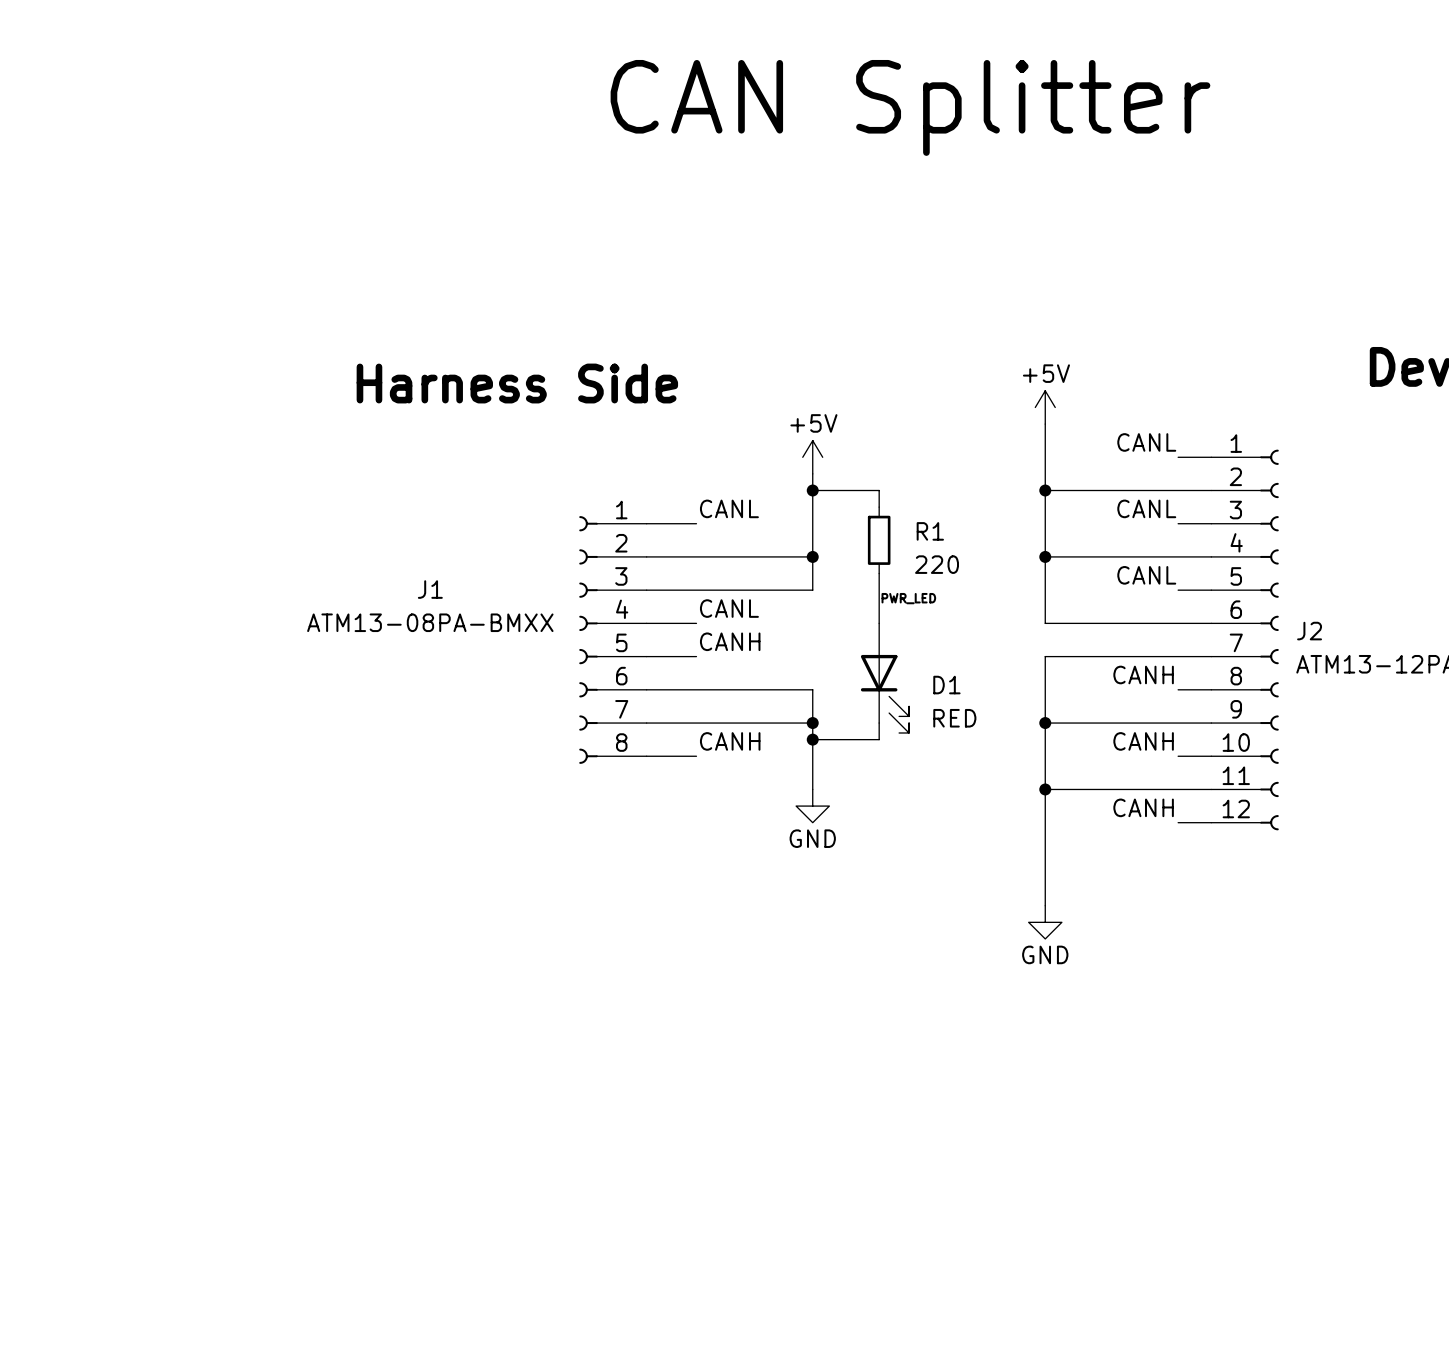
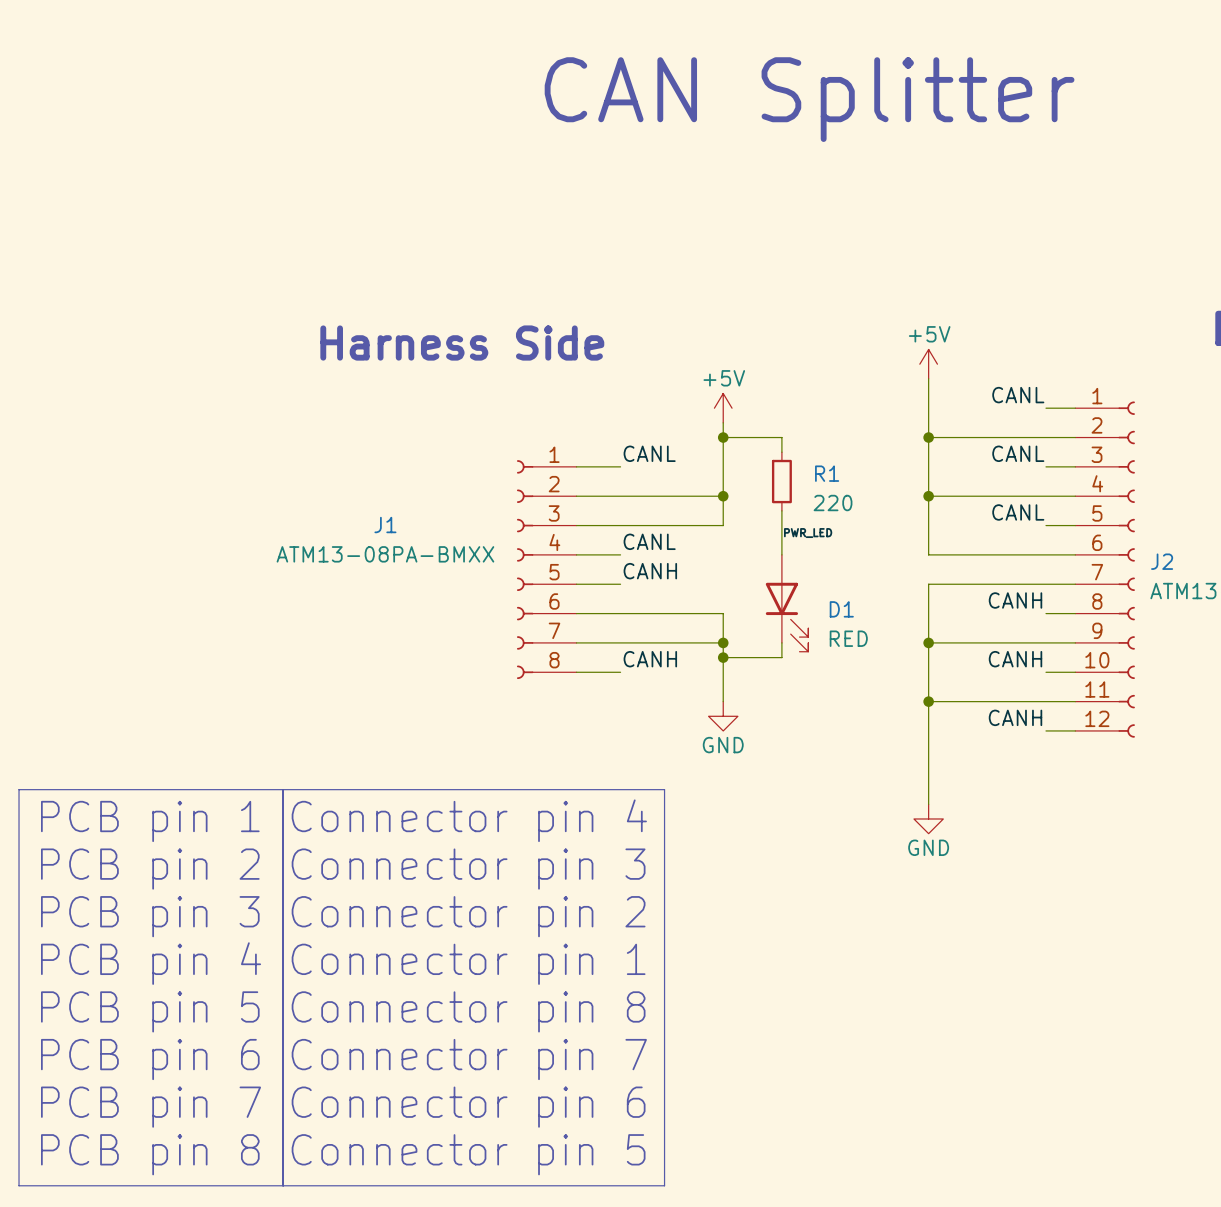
line: none -> (19, 789) (664, 789) (664, 1185) (19, 1185) (19, 789)
line: none -> (283, 789) (283, 1185)
text: none -> PCB pin 1 Connector pin 4 (343, 820)
text: none -> PCB pin 2 Connector pin 3 (343, 869)
text: none -> PCB pin 3 Connector pin 2 (343, 916)
text: none -> PCB pin 4 Connector pin 1 (343, 963)
text: none -> PCB pin 5 Connector pin 8 (343, 1011)
text: none -> PCB pin 6 Connector pin 7 (343, 1059)
text: none -> PCB pin 7 Connector pin 6 (343, 1107)
text: none -> PCB pin 8 Connector pin 5 (343, 1154)

